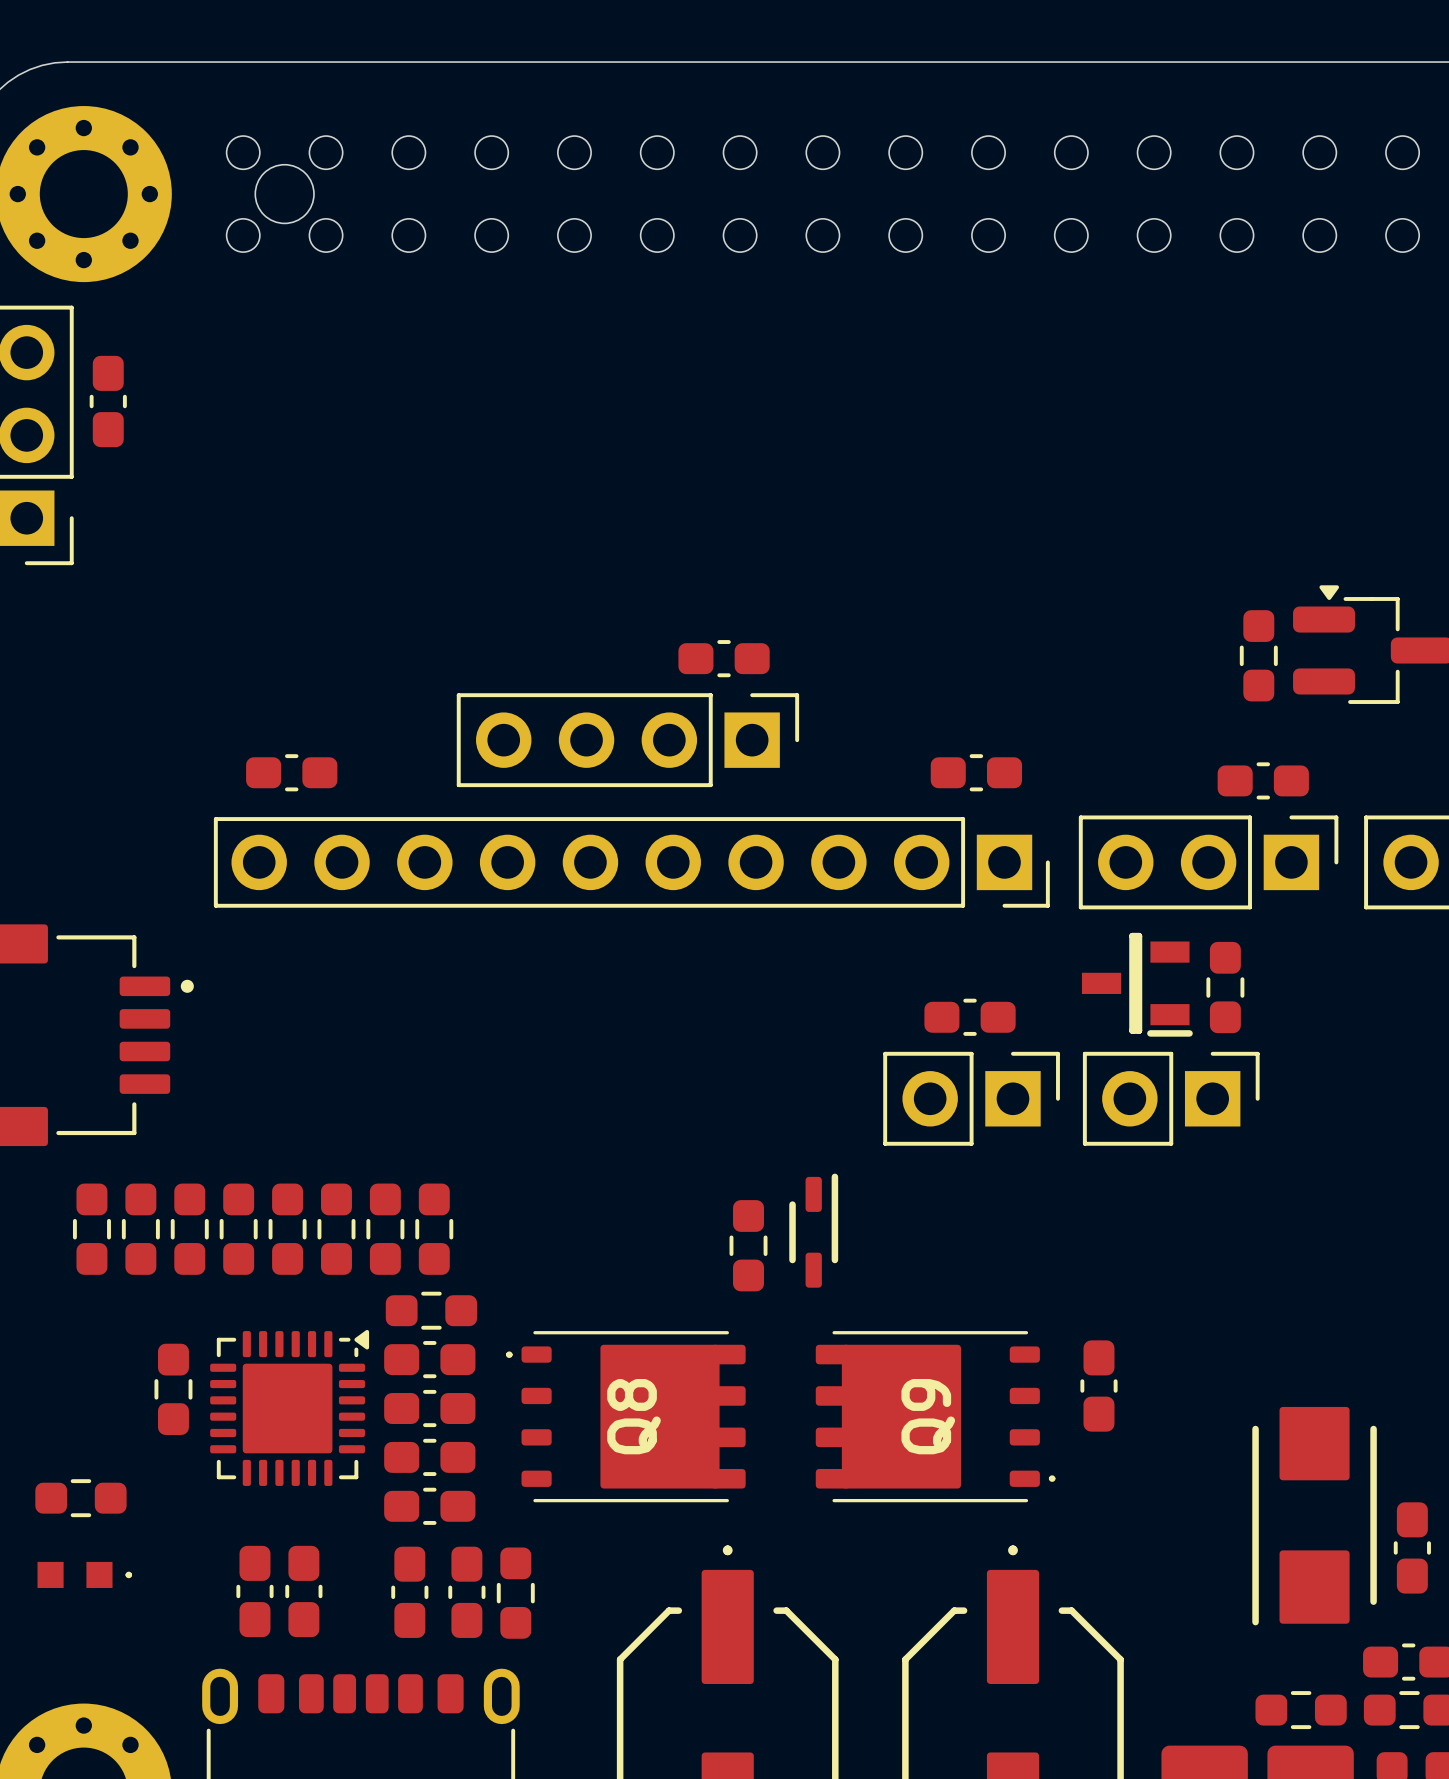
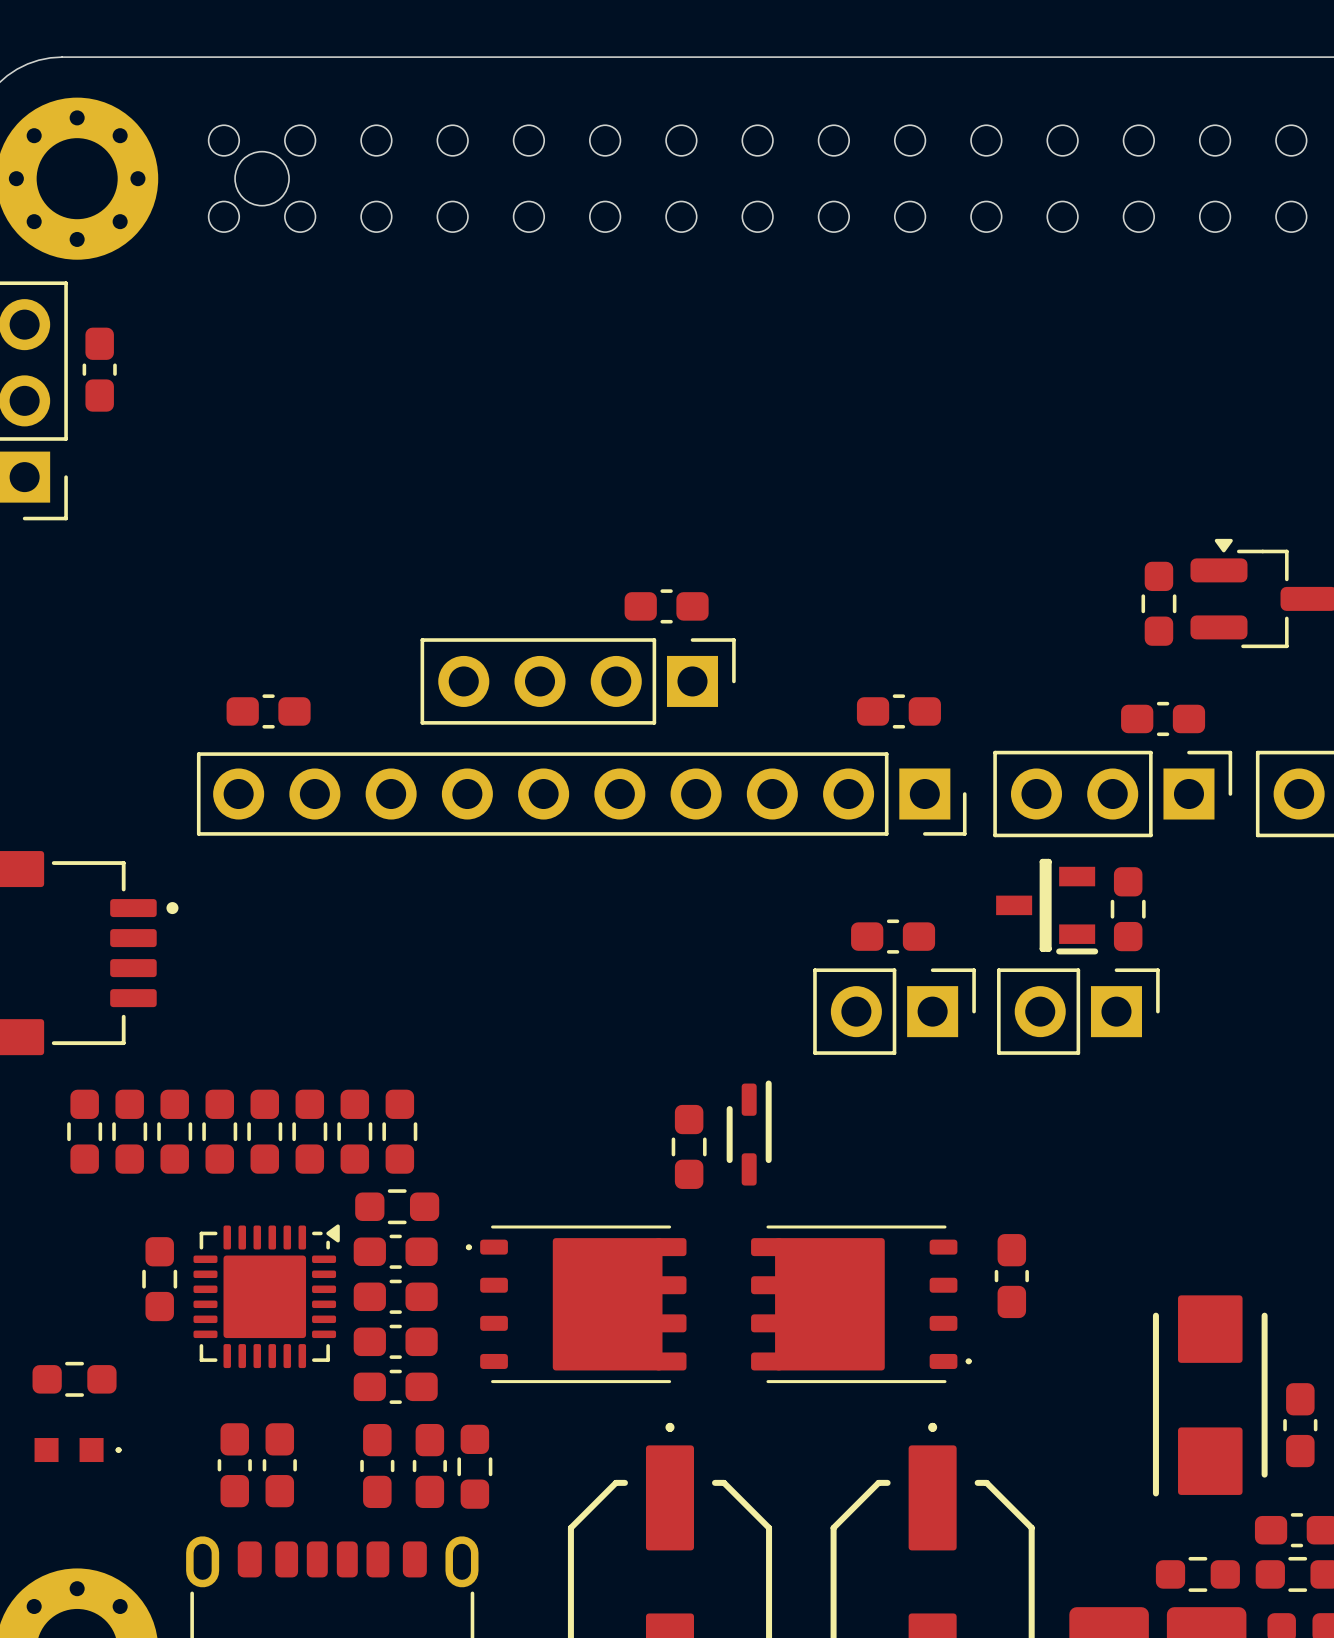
Q8 name: Q8 (634, 1416) -> none
Q9 name: Q9 (928, 1416) -> none

